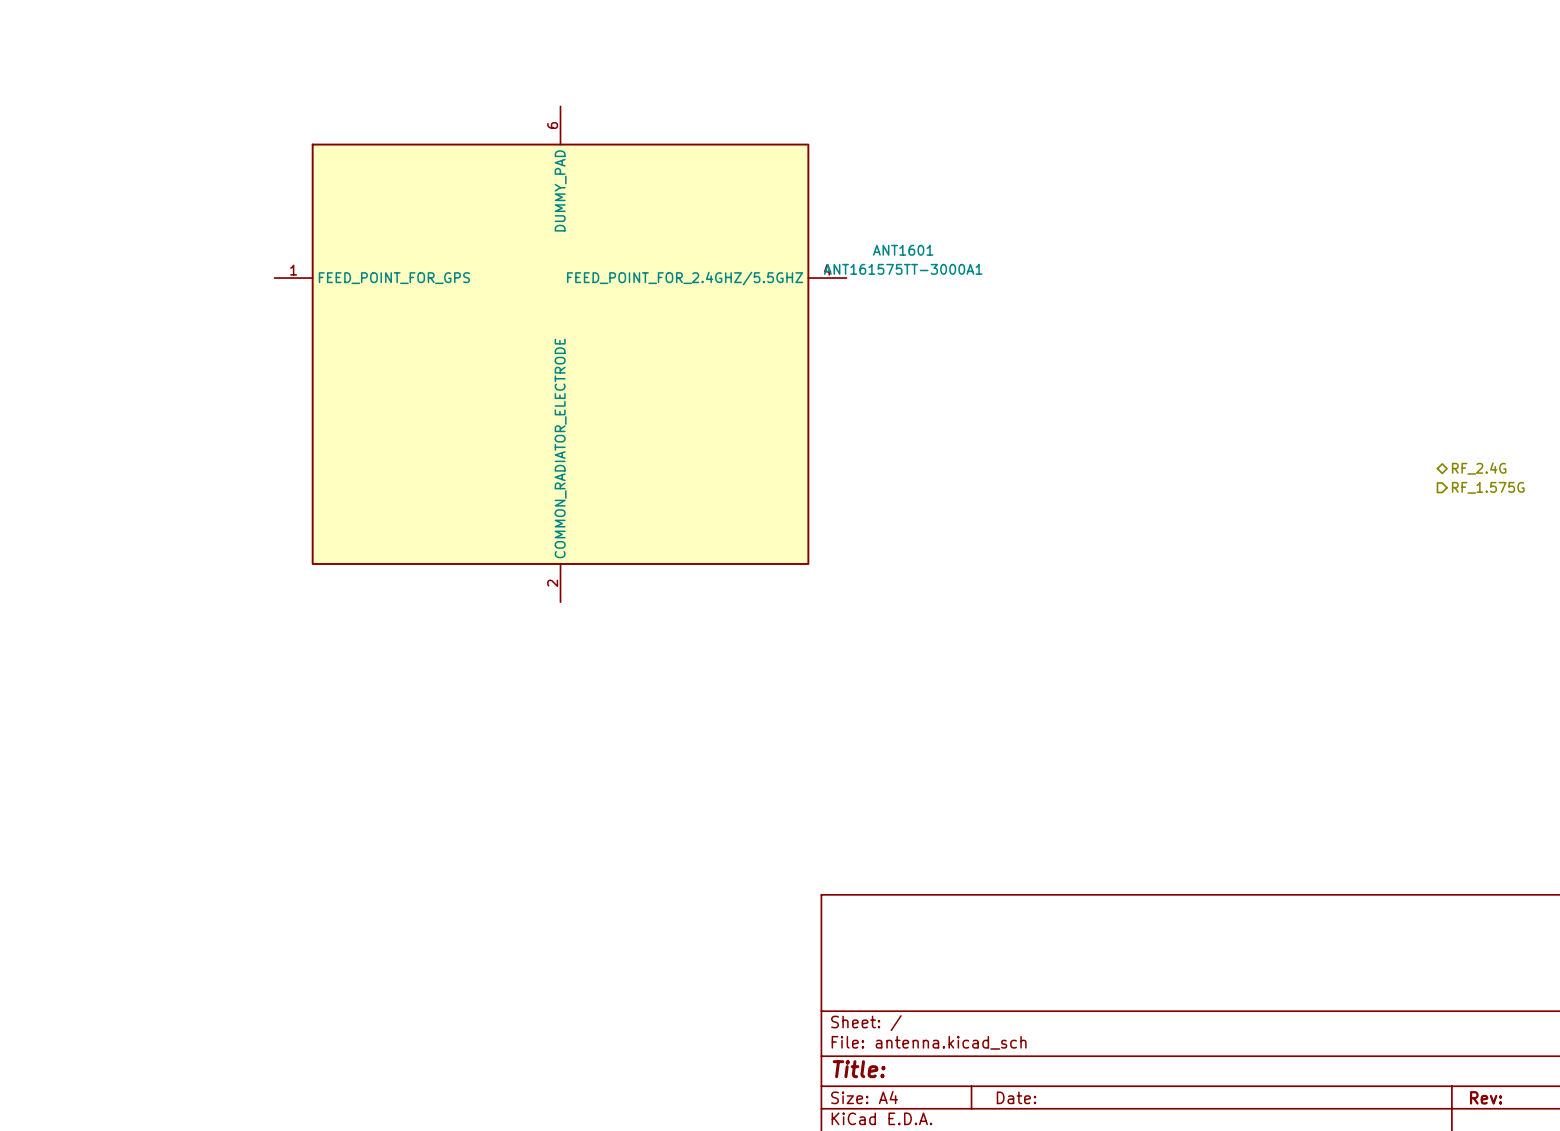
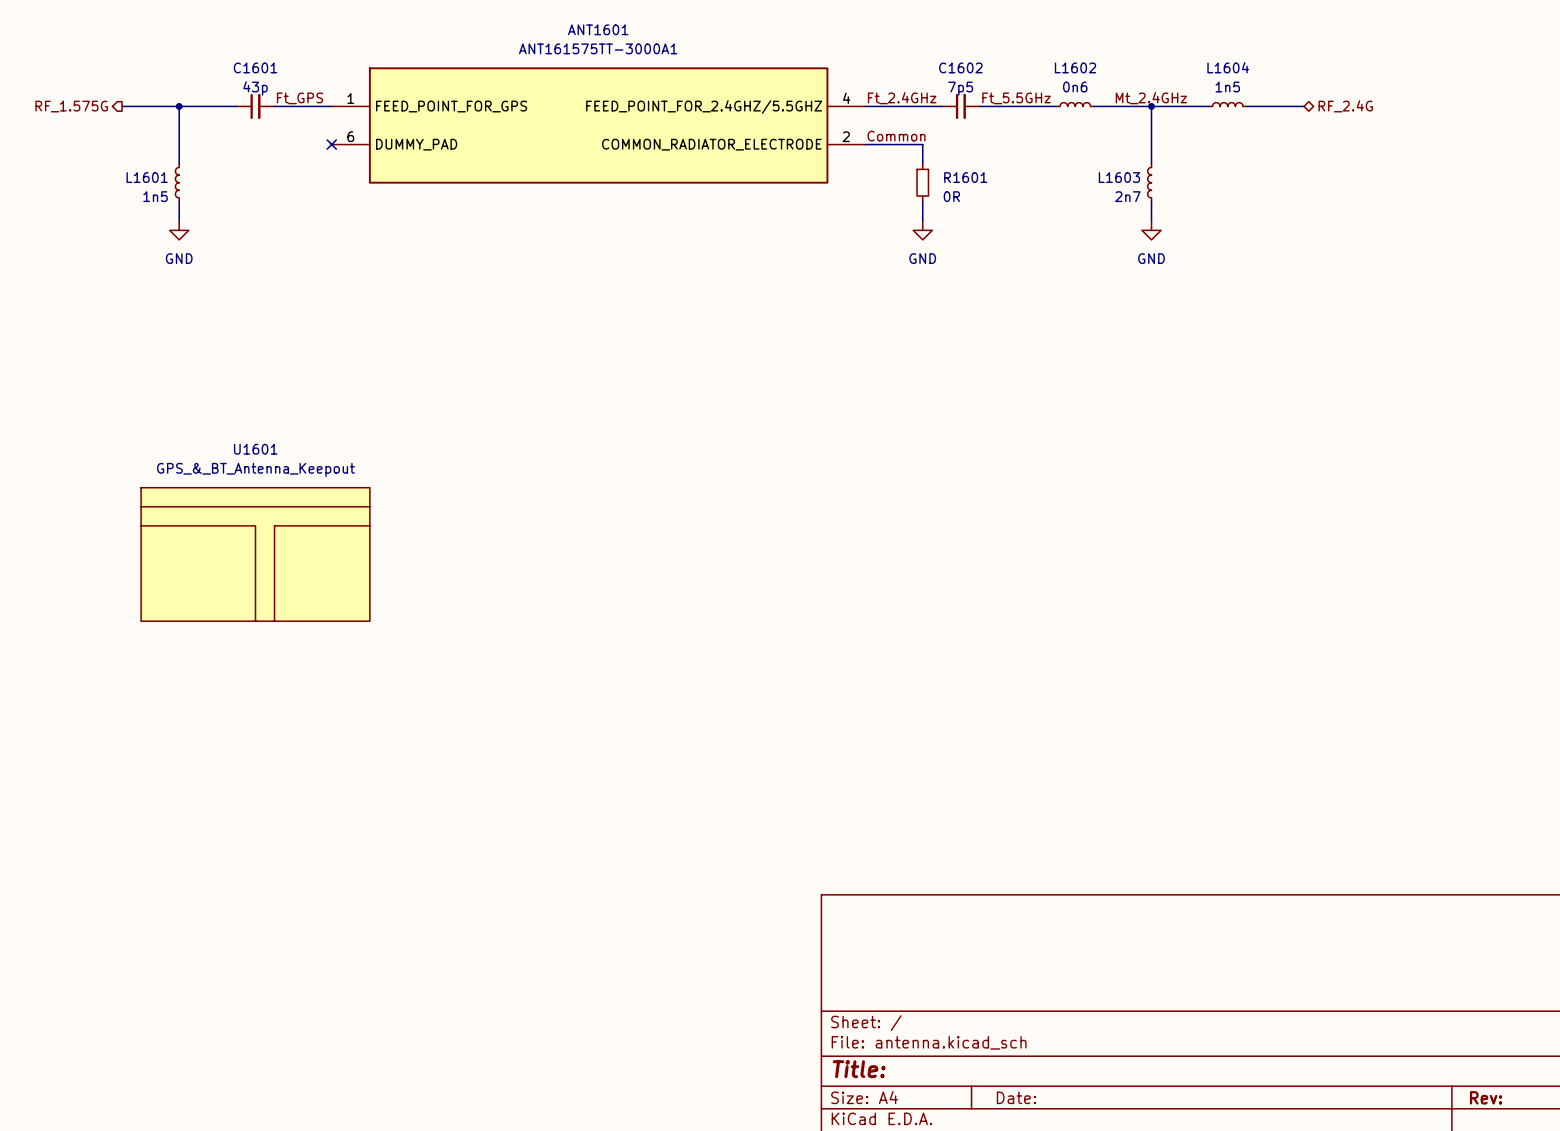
label: none -> Ft_GPS (300, 98)
label: none -> Ft_2.4GHz (902, 98)
label: none -> Ft_5.5GHz (1016, 98)
label: none -> Mt_2.4GHz (1151, 98)
L1602: none -> 0n6 (1075, 104)
L1604: none -> 1n5 (1227, 104)
hierarchical label: none -> RF_1.575G (71, 106)
wire: none -> (122, 106) (236, 106)
wire: none -> (179, 106) (179, 163)
junction: none -> (179, 106)
C1601: none -> 43p (255, 106)
wire: none -> (274, 106) (331, 106)
ANT1601 symbol: [274, 106, 847, 603] -> [331, 67, 866, 184]
wire: none -> (865, 106) (941, 106)
C1602: none -> 7p5 (960, 106)
wire: none -> (979, 106) (1056, 106)
wire: none -> (1094, 106) (1208, 106)
wire: none -> (1151, 106) (1151, 163)
junction: none -> (1151, 106)
wire: none -> (1246, 106) (1304, 106)
hierarchical label: none -> RF_2.4G (1345, 106)
label: none -> Common (896, 136)
no-connect mark: none -> (331, 144)
wire: none -> (865, 144) (922, 144) (922, 163)
L1601: none -> 1n5 (177, 182)
R1601: none -> 0R (922, 182)
L1603: none -> 2n7 (1149, 182)
wire: none -> (179, 201) (179, 220)
wire: none -> (922, 201) (922, 220)
wire: none -> (1151, 201) (1151, 220)
power symbol: none -> GND (179, 230)
power symbol: none -> GND (922, 230)
power symbol: none -> GND (1151, 230)
ANT1601 name position: ANT1601 (903, 250) -> ANT1601 (598, 29)
ANT1601 value position: ANT161575TT-3000A1 (903, 269) -> ANT161575TT-3000A1 (598, 48)
hierarchical label: RF_2.4G (1479, 468) -> none
hierarchical label: RF_1.575G (1488, 487) -> none
U1601: none -> GPS_&_BT_Antenna_Keepout (255, 554)

